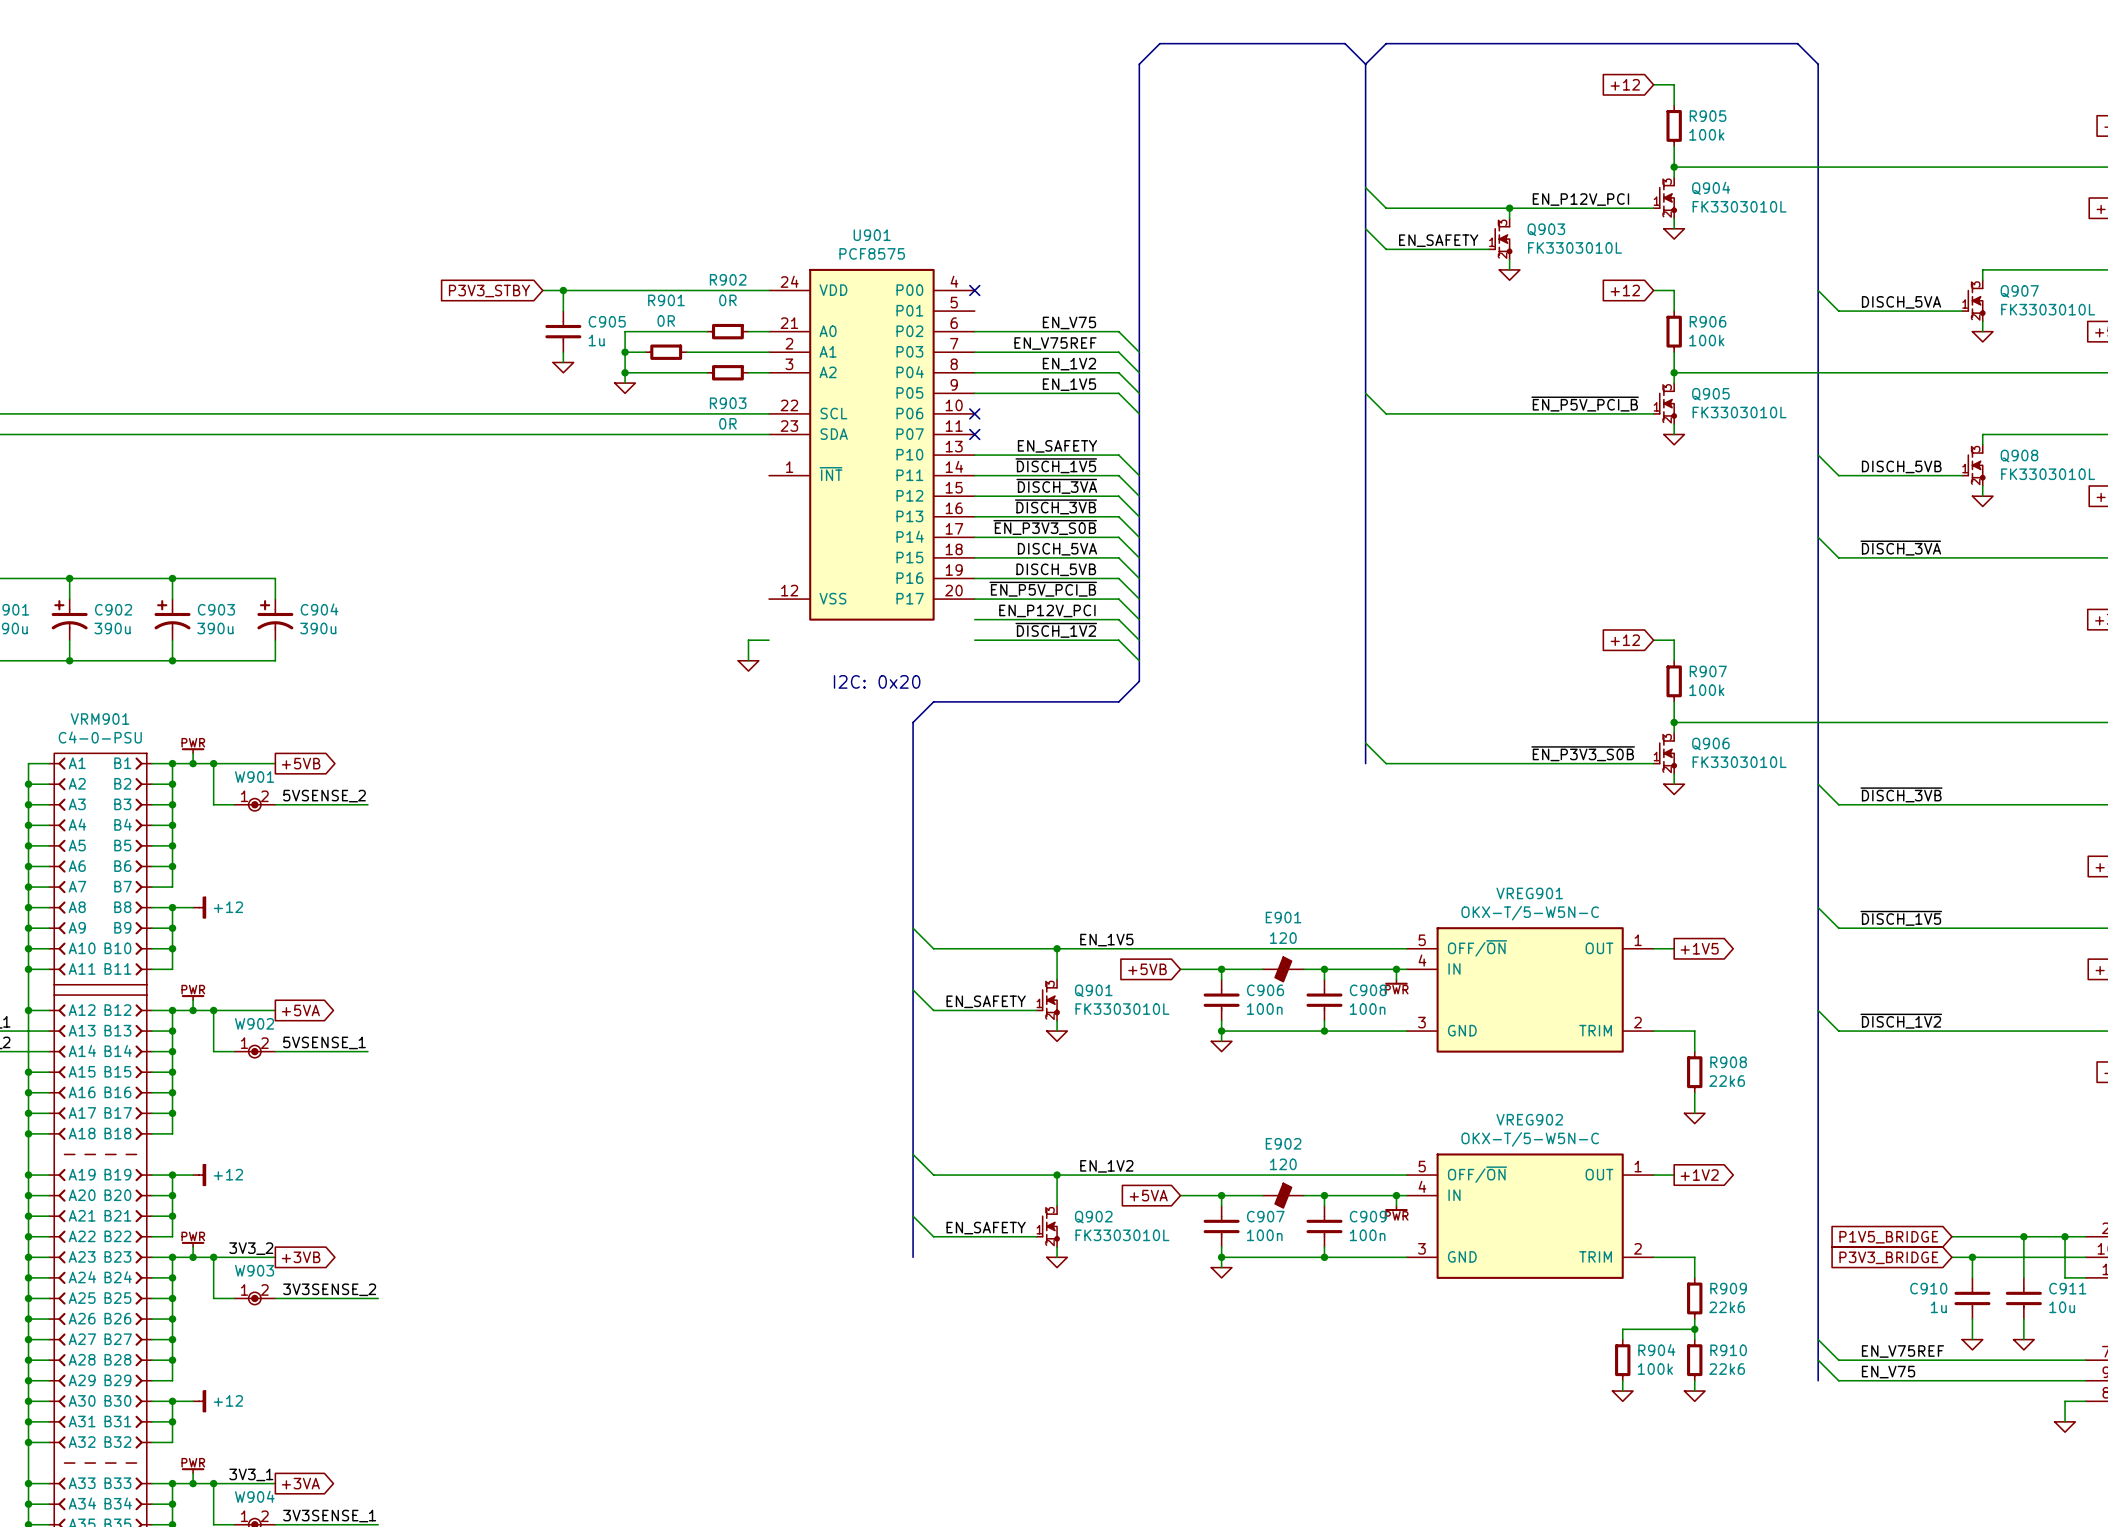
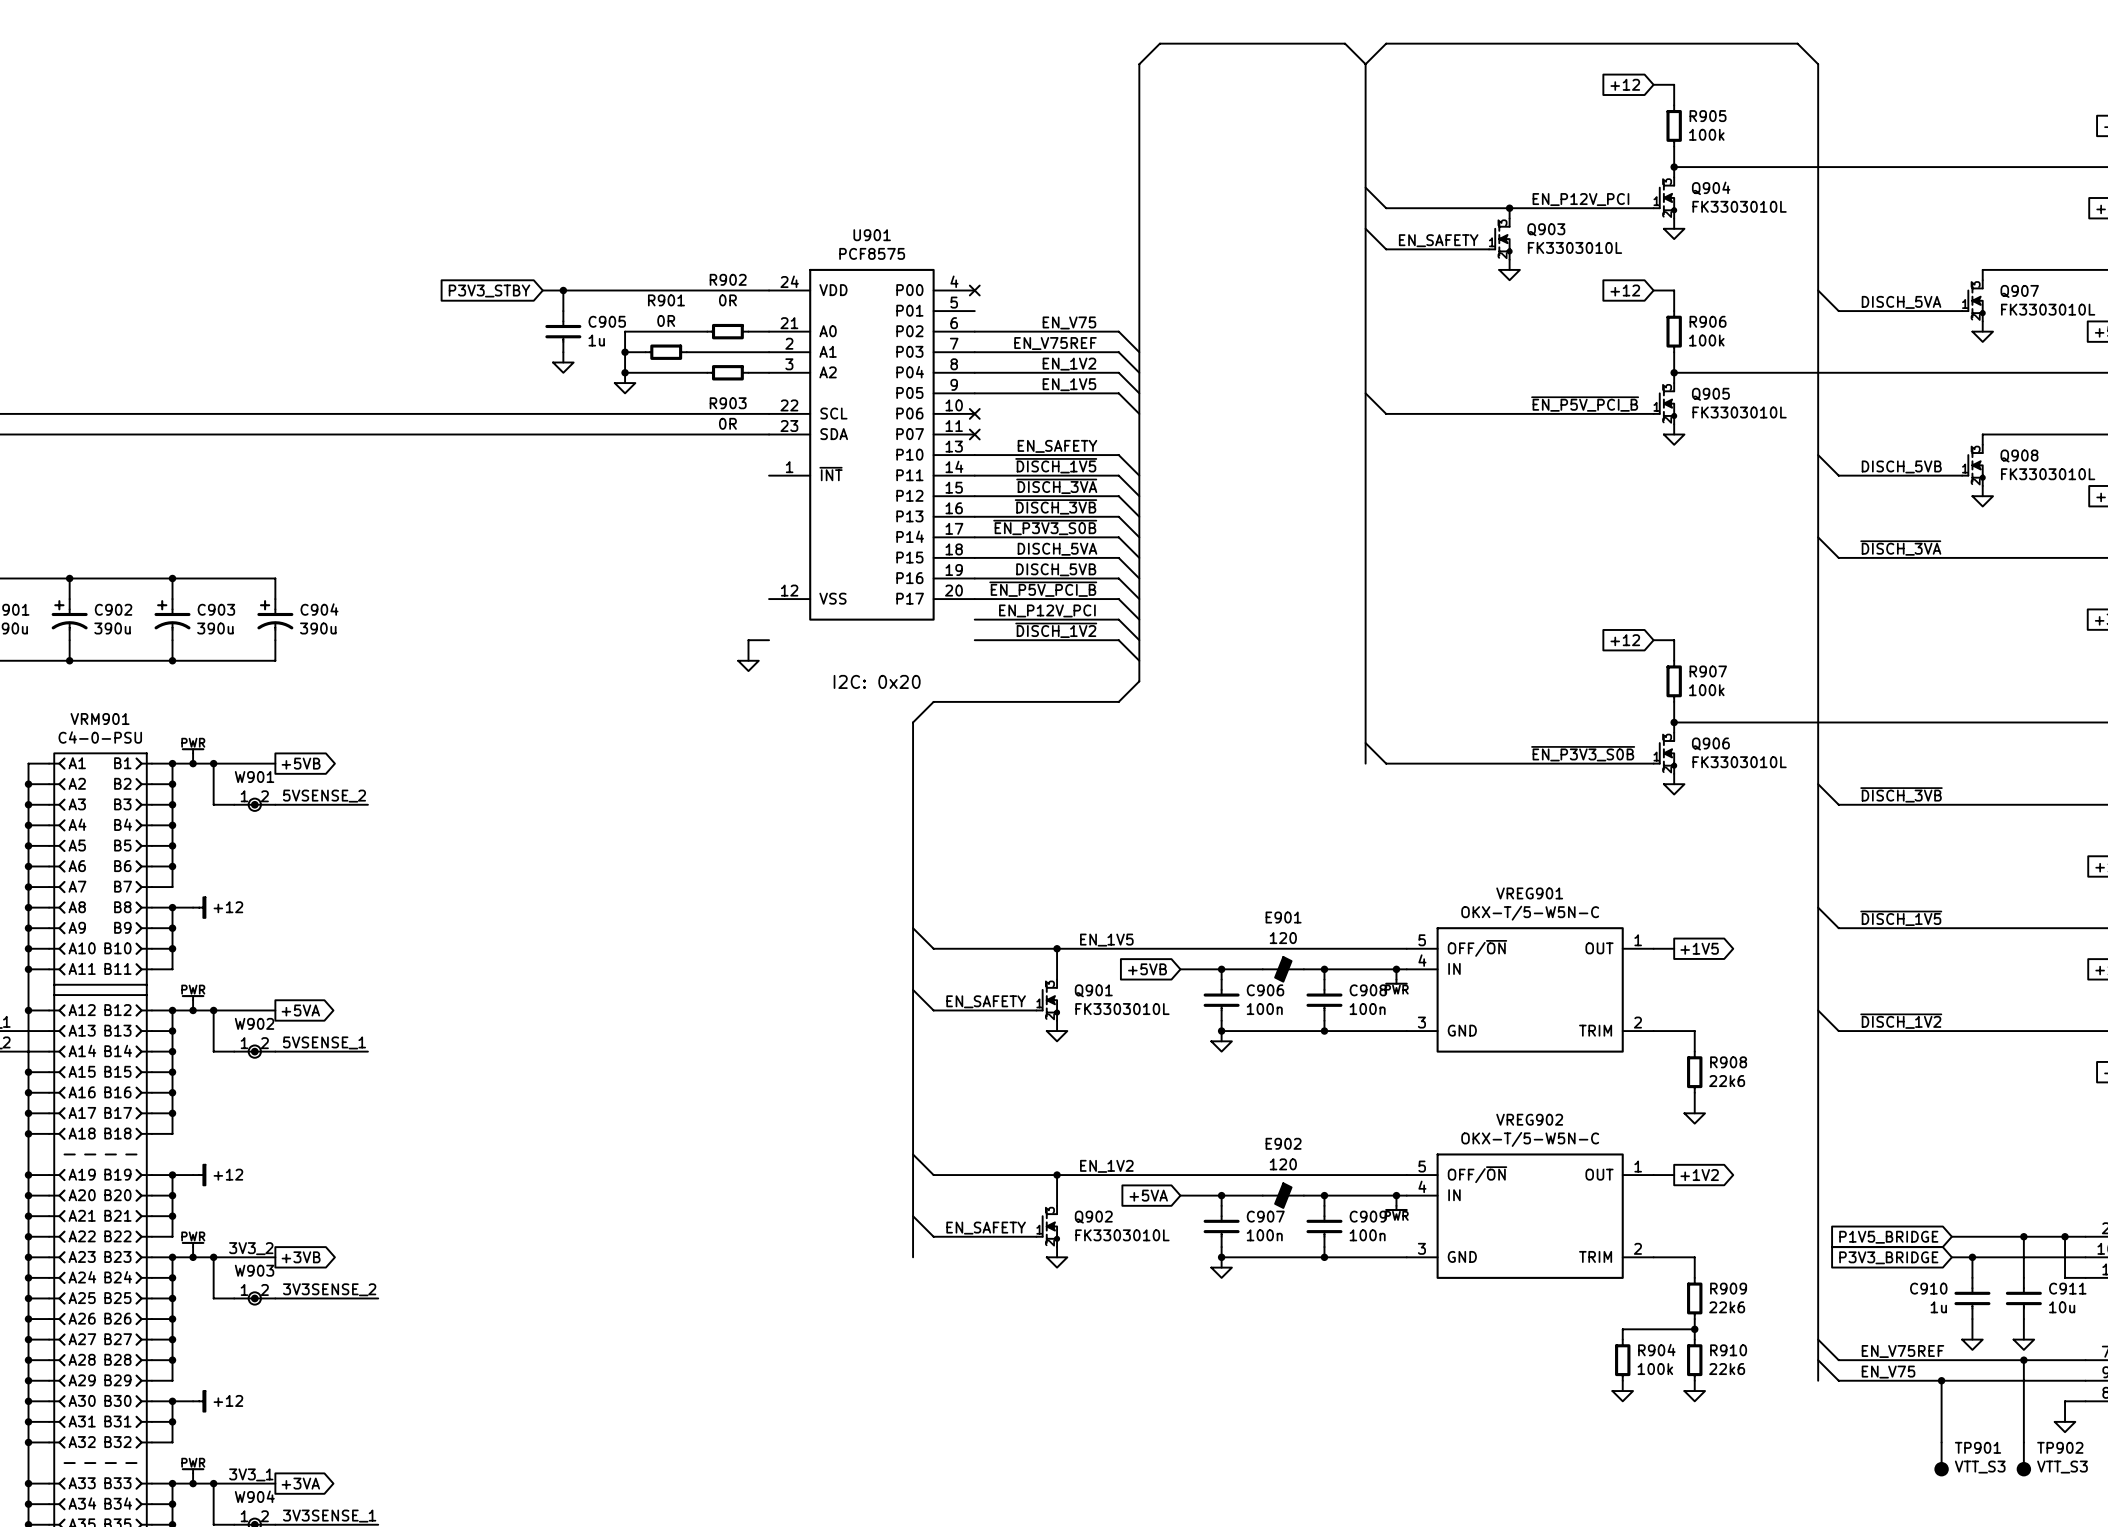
wire: none -> (2023, 1360) (2023, 1442)
junction: none -> (2023, 1360)
wire: none -> (1941, 1380) (1941, 1442)
junction: none -> (1941, 1380)
TP901: none -> VTT_S3 (1941, 1459)
TP902: none -> VTT_S3 (2023, 1459)

